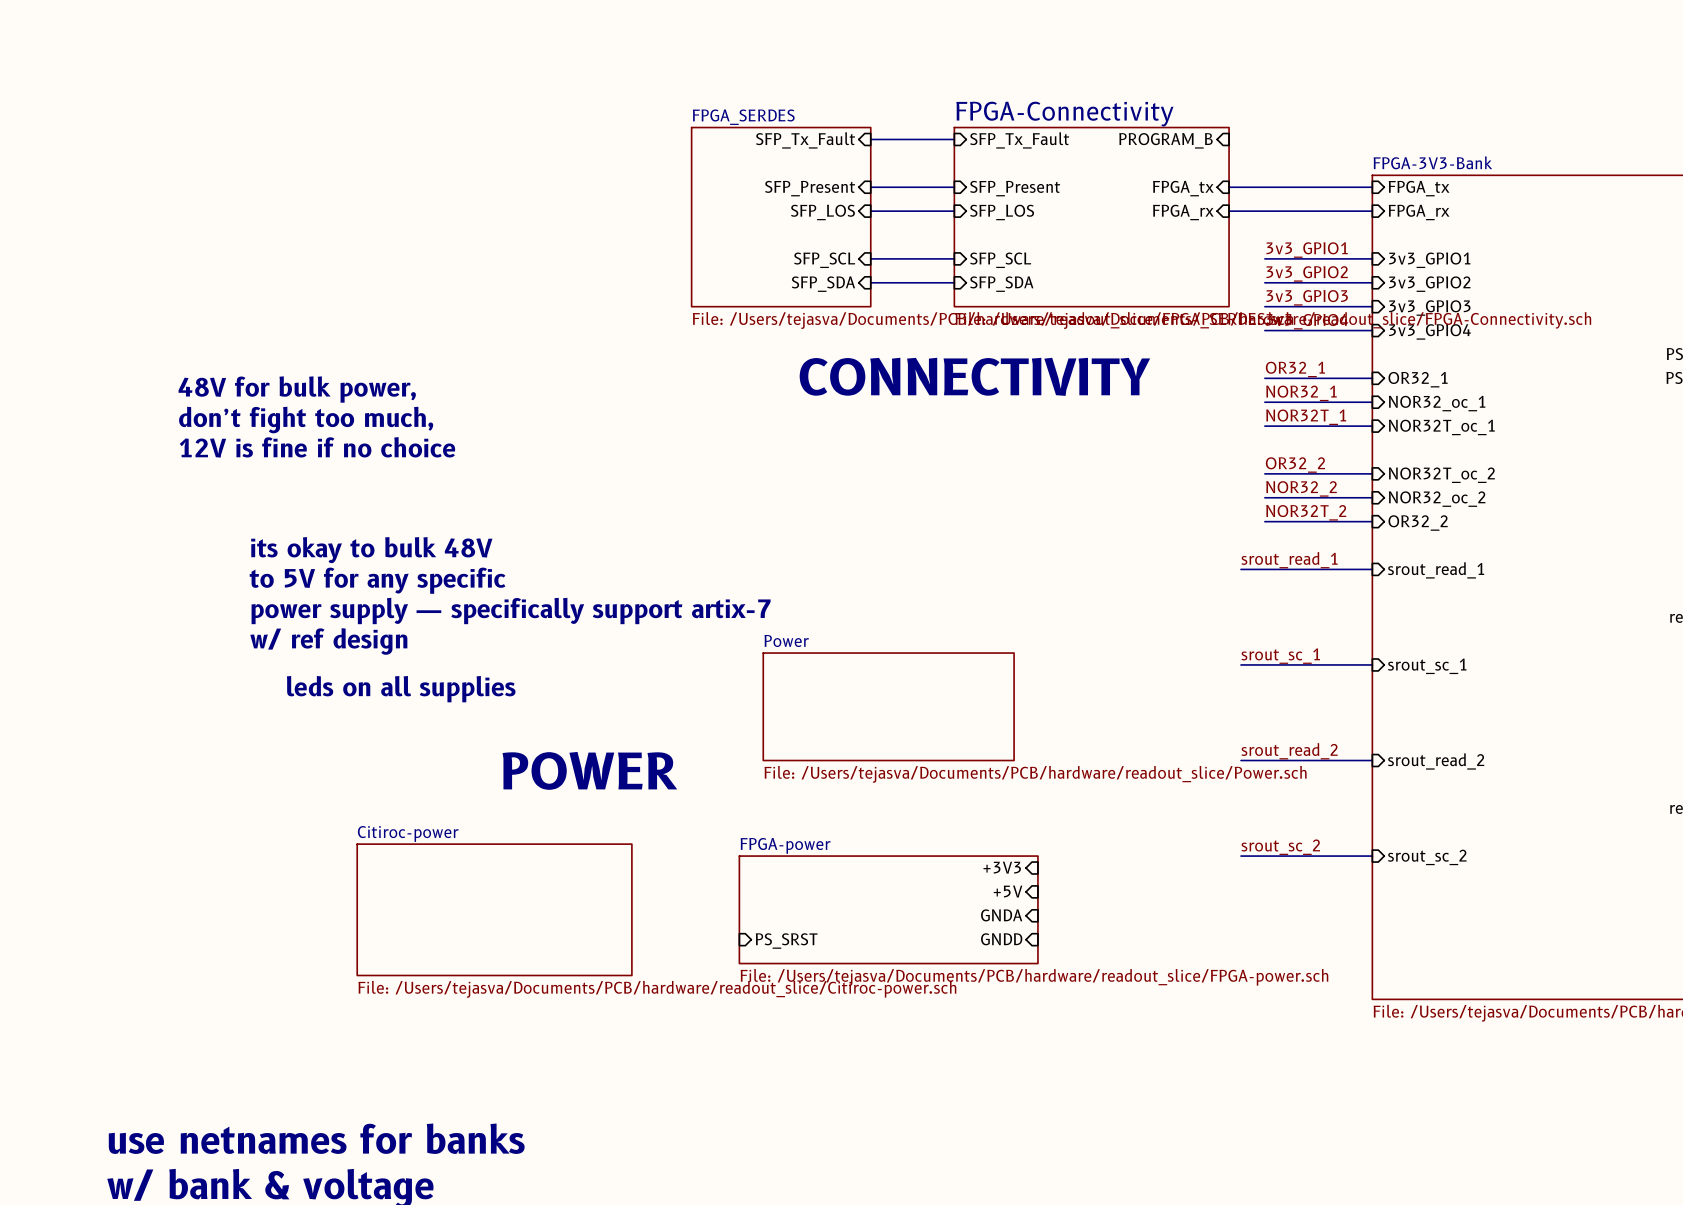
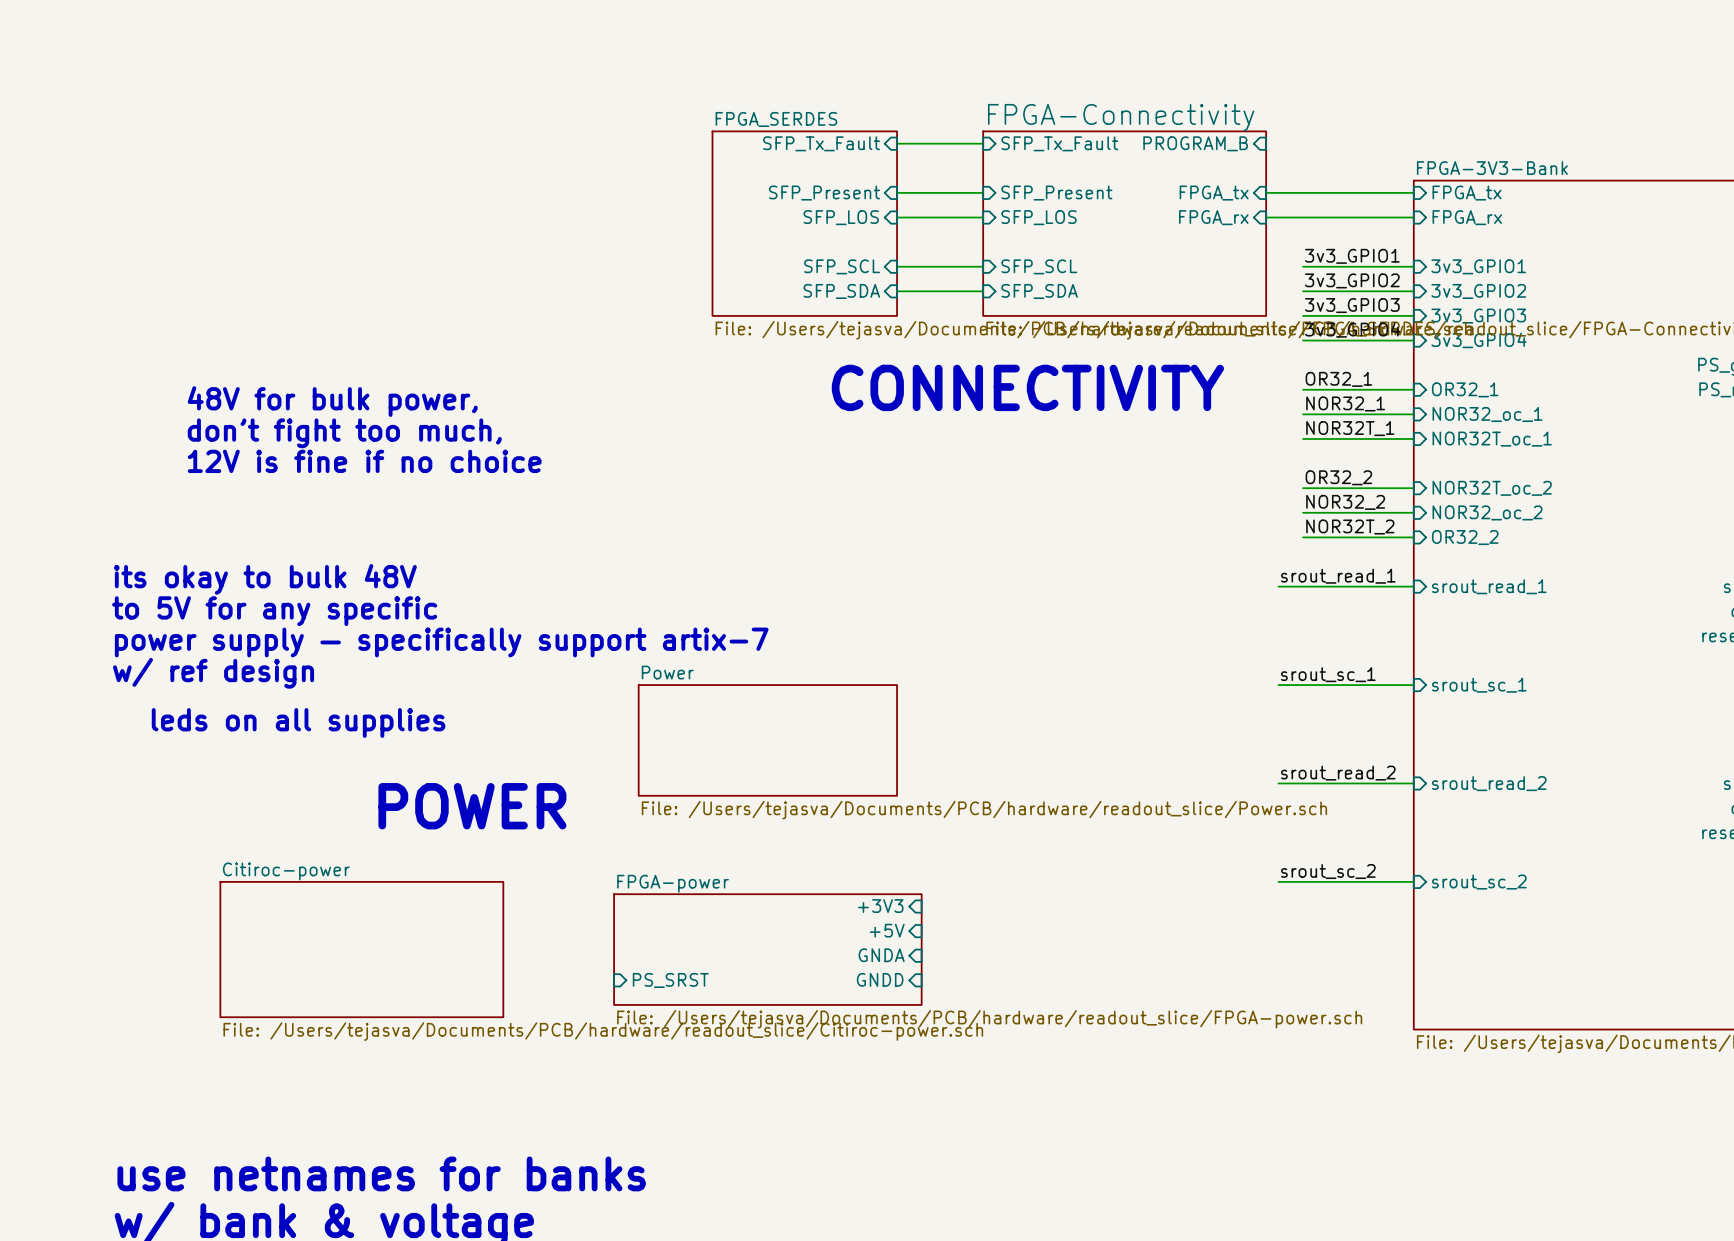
text position: its okay to bulk 48V (371, 550) -> its okay to bulk 48V (265, 579)
text position: to 5V for any specific (377, 580) -> to 5V for any specific (274, 611)
text position: power supply — specifically support artix-7 (511, 611) -> power supply — specifically support artix-7 (441, 642)
text position: w/ ref design (328, 641) -> w/ ref design (213, 673)
text position: leds on all supplies (401, 689) -> leds on all supplies (298, 722)
sheet Power position: (888, 706) -> (767, 740)
text position: POWER (589, 770) -> POWER (472, 806)
sheet pin position: +3V3 (1002, 867) -> +3V3 (880, 906)
sheet pin position: +5V (1008, 891) -> +5V (887, 930)
sheet Citiroc-power position: (494, 909) -> (361, 949)
sheet FPGA-power position: (888, 909) -> (767, 949)
sheet pin position: GNDA (1001, 915) -> GNDA (881, 955)
sheet pin position: GNDD (1001, 939) -> GNDD (880, 979)
sheet pin position: PS_SRST (786, 941) -> PS_SRST (670, 980)

